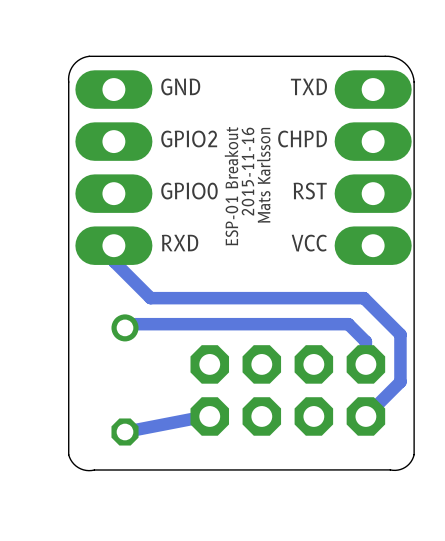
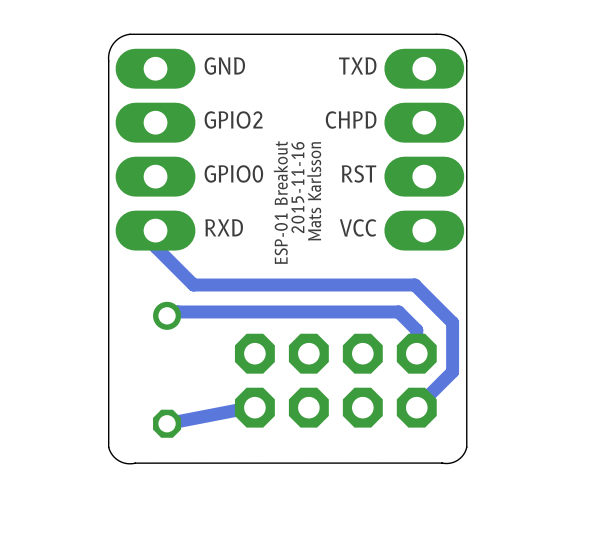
text position: 2015-11-16 (247, 171) -> 2015-11-16 (297, 187)
text position: Mats Karlsson (263, 175) -> Mats Karlsson (314, 191)
text position: ESP-01 Breakout (231, 186) -> ESP-01 Breakout (280, 202)

